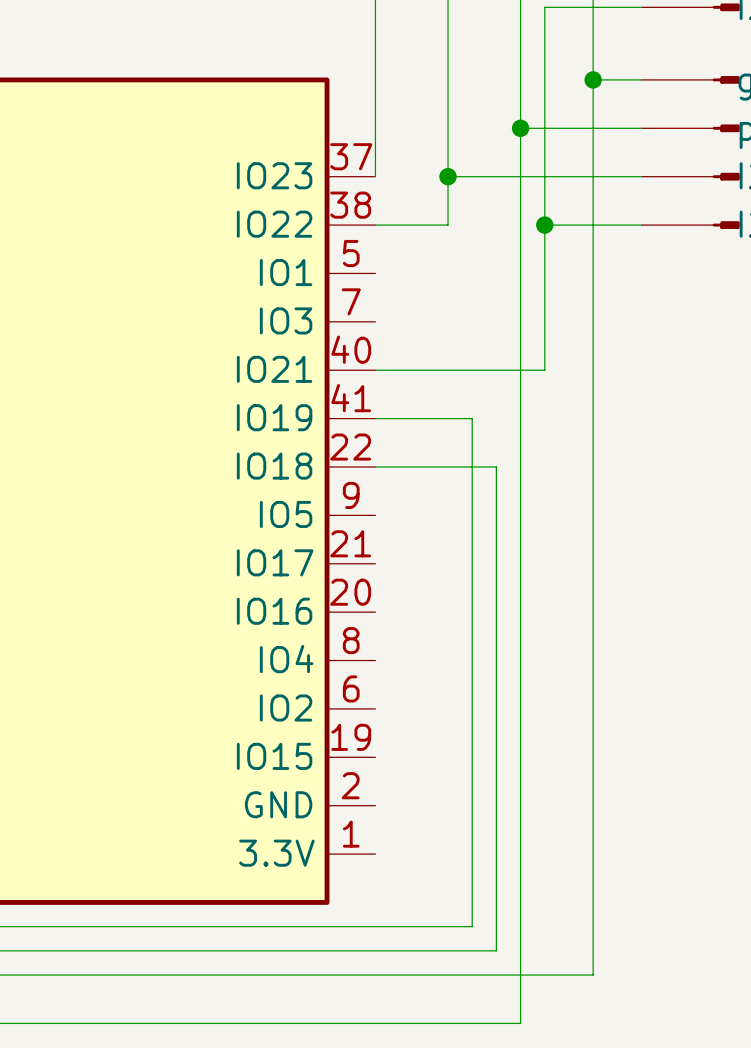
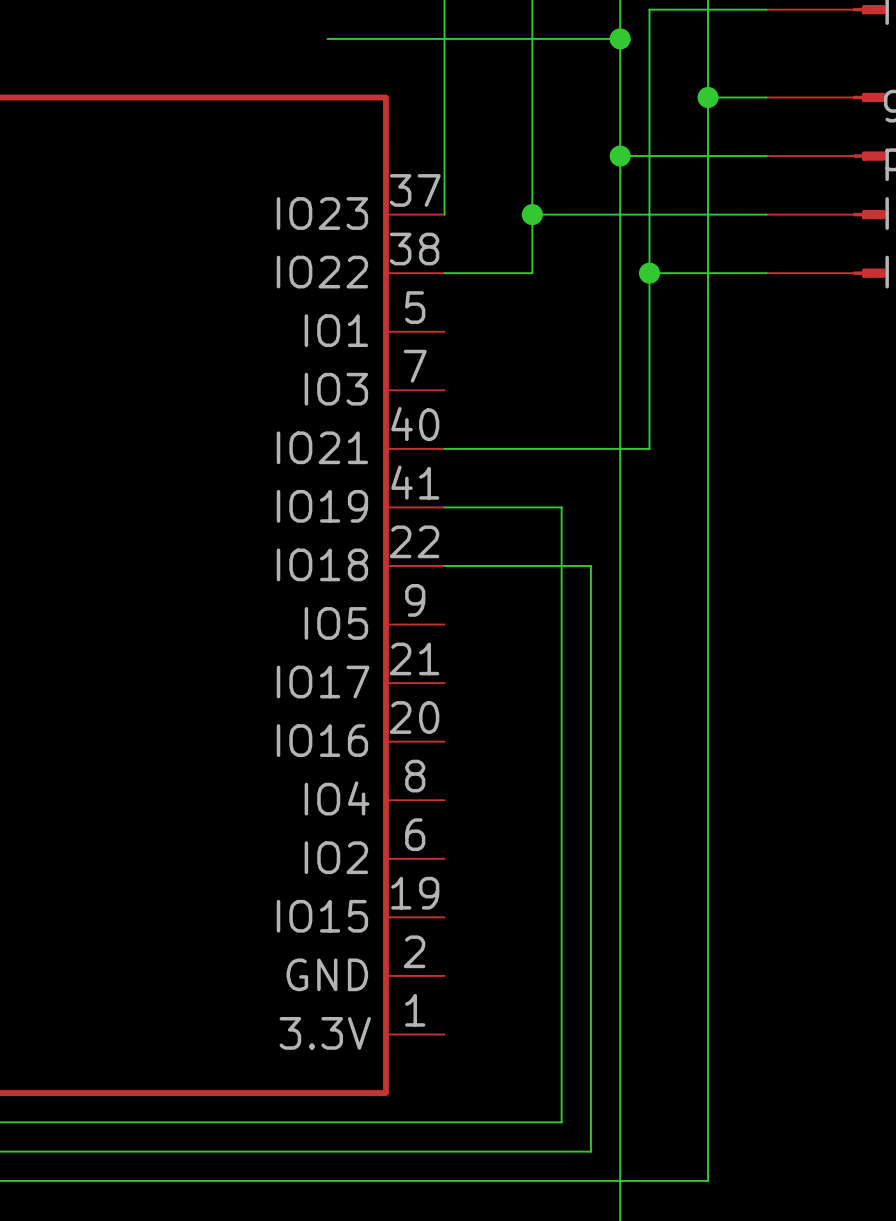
wire: none -> (327, 38) (620, 38)
junction: none -> (620, 38)

